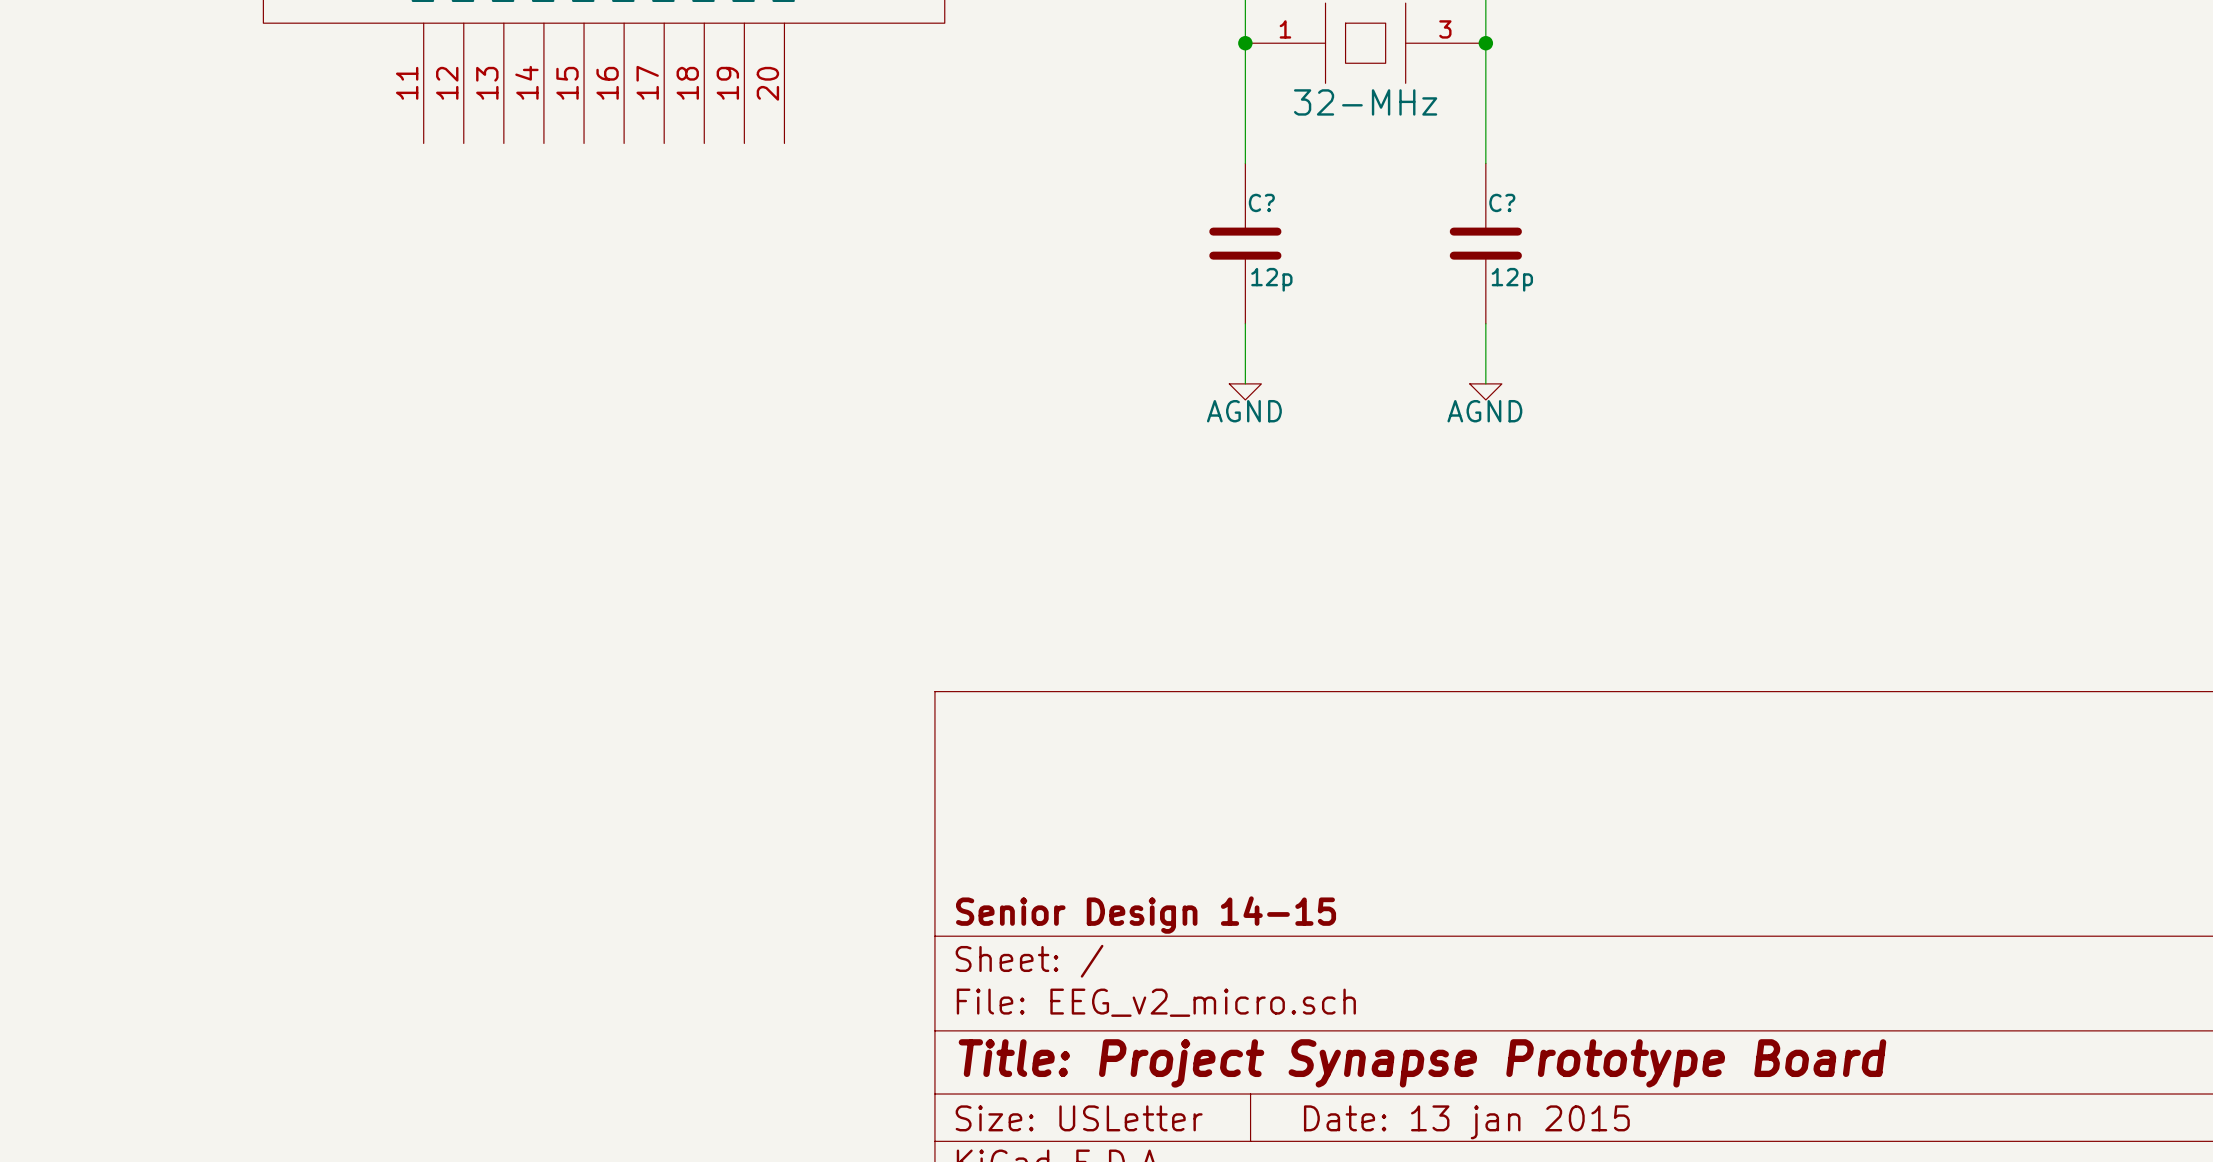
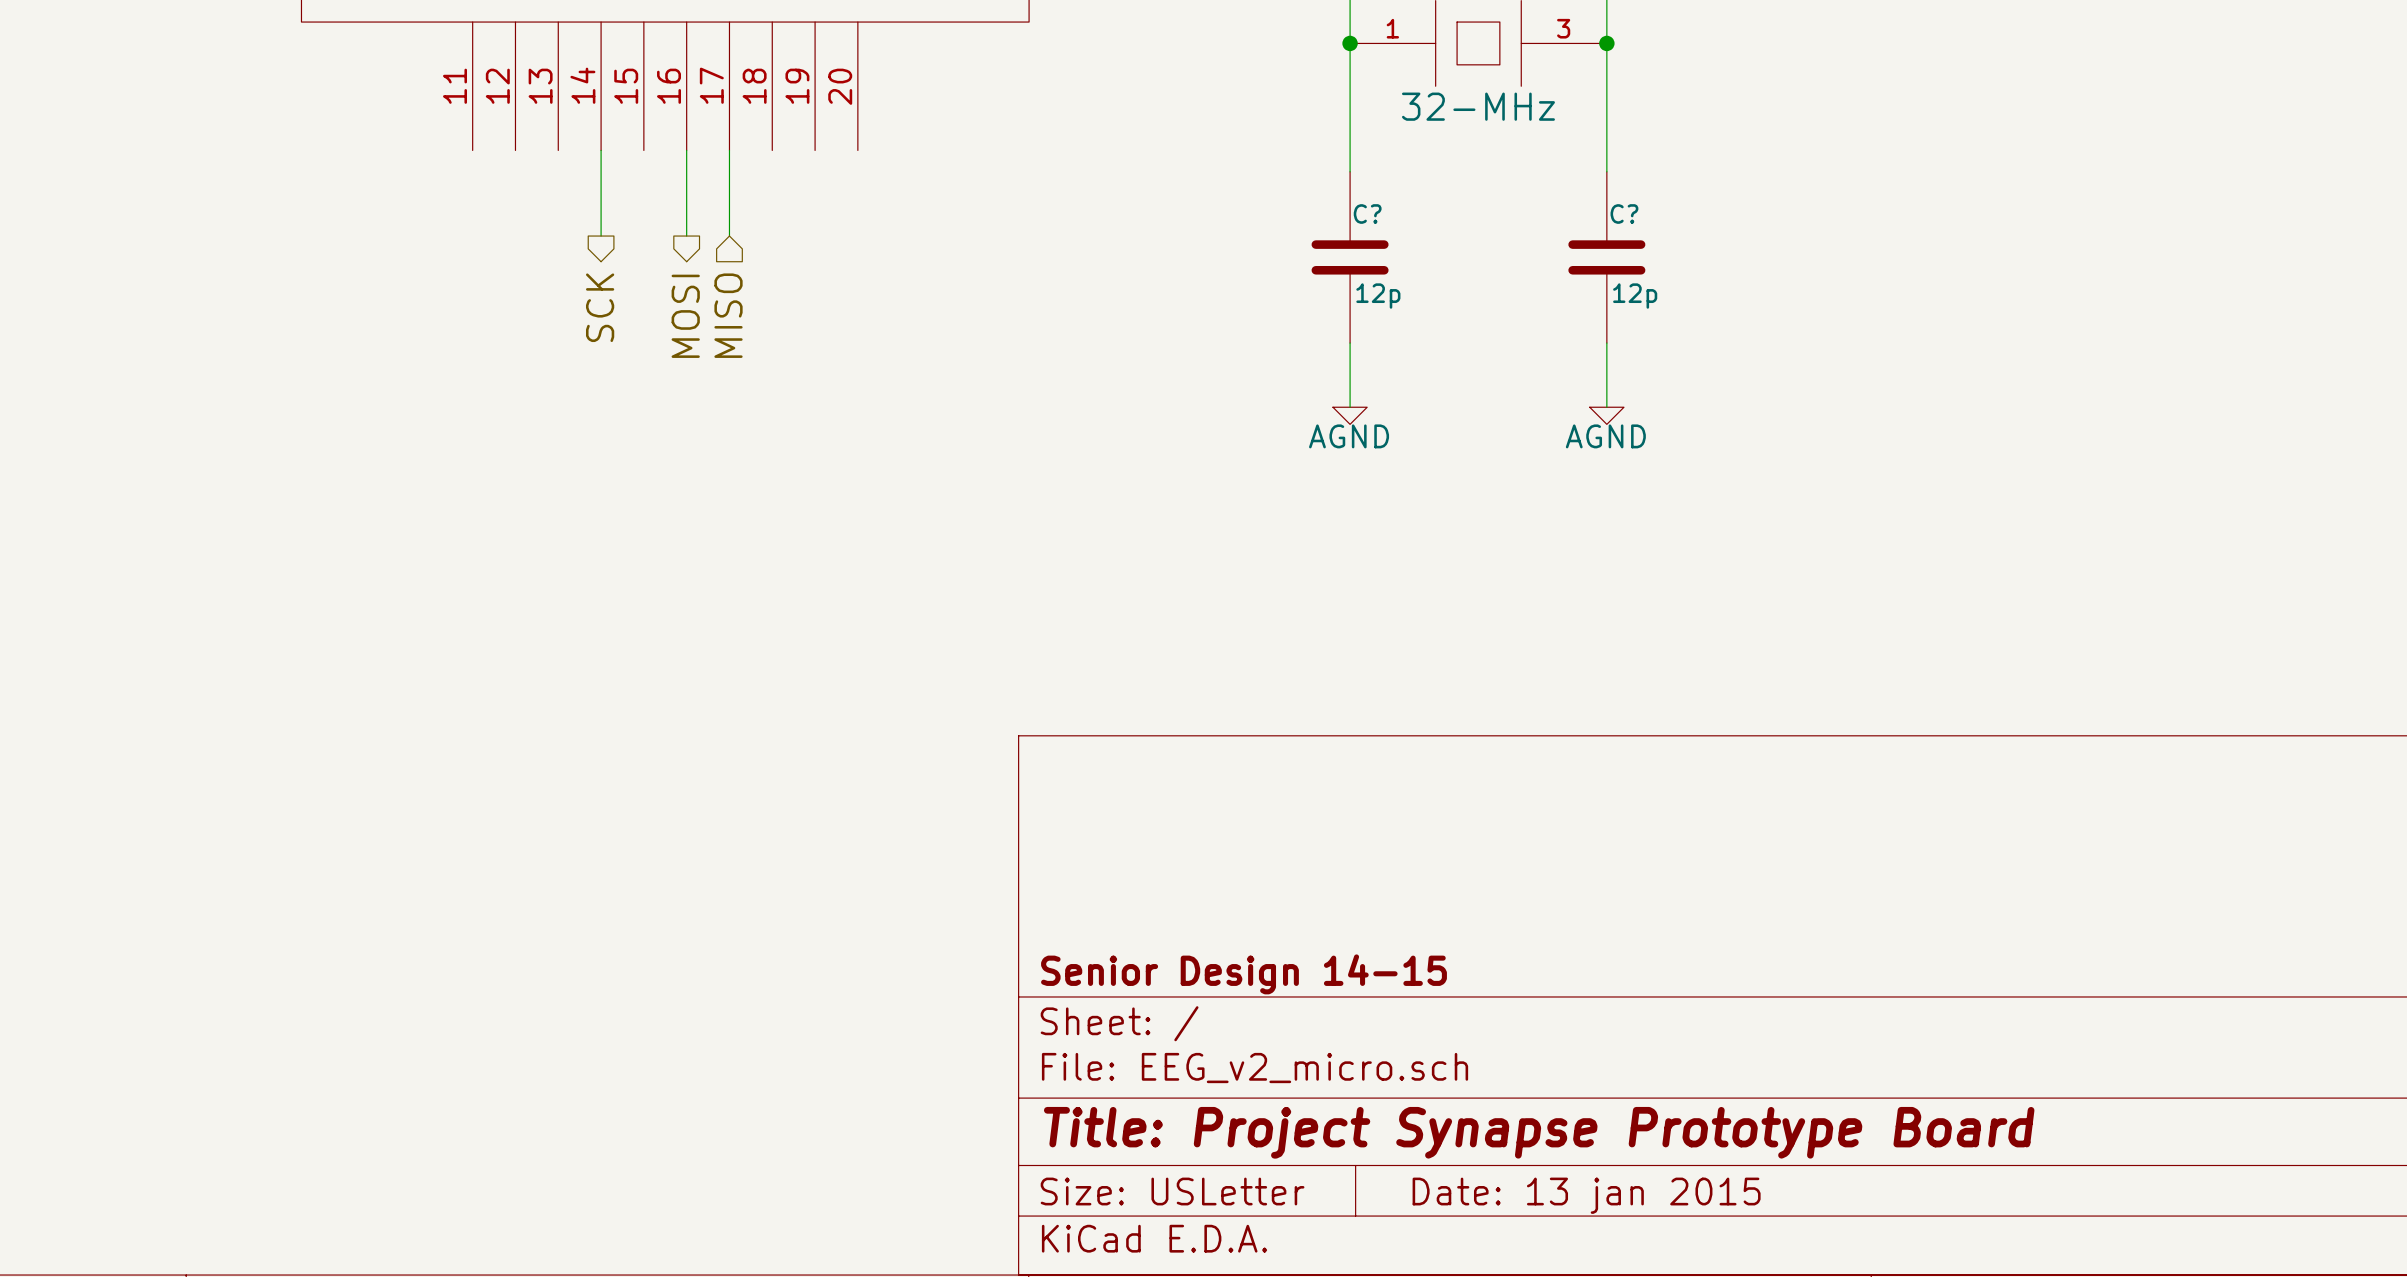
wire: none -> (601, 150) (601, 236)
wire: none -> (686, 150) (686, 236)
wire: none -> (729, 150) (729, 236)
hierarchical label: none -> SCK (600, 307)
hierarchical label: none -> MOSI (685, 316)
hierarchical label: none -> MISO (728, 315)

